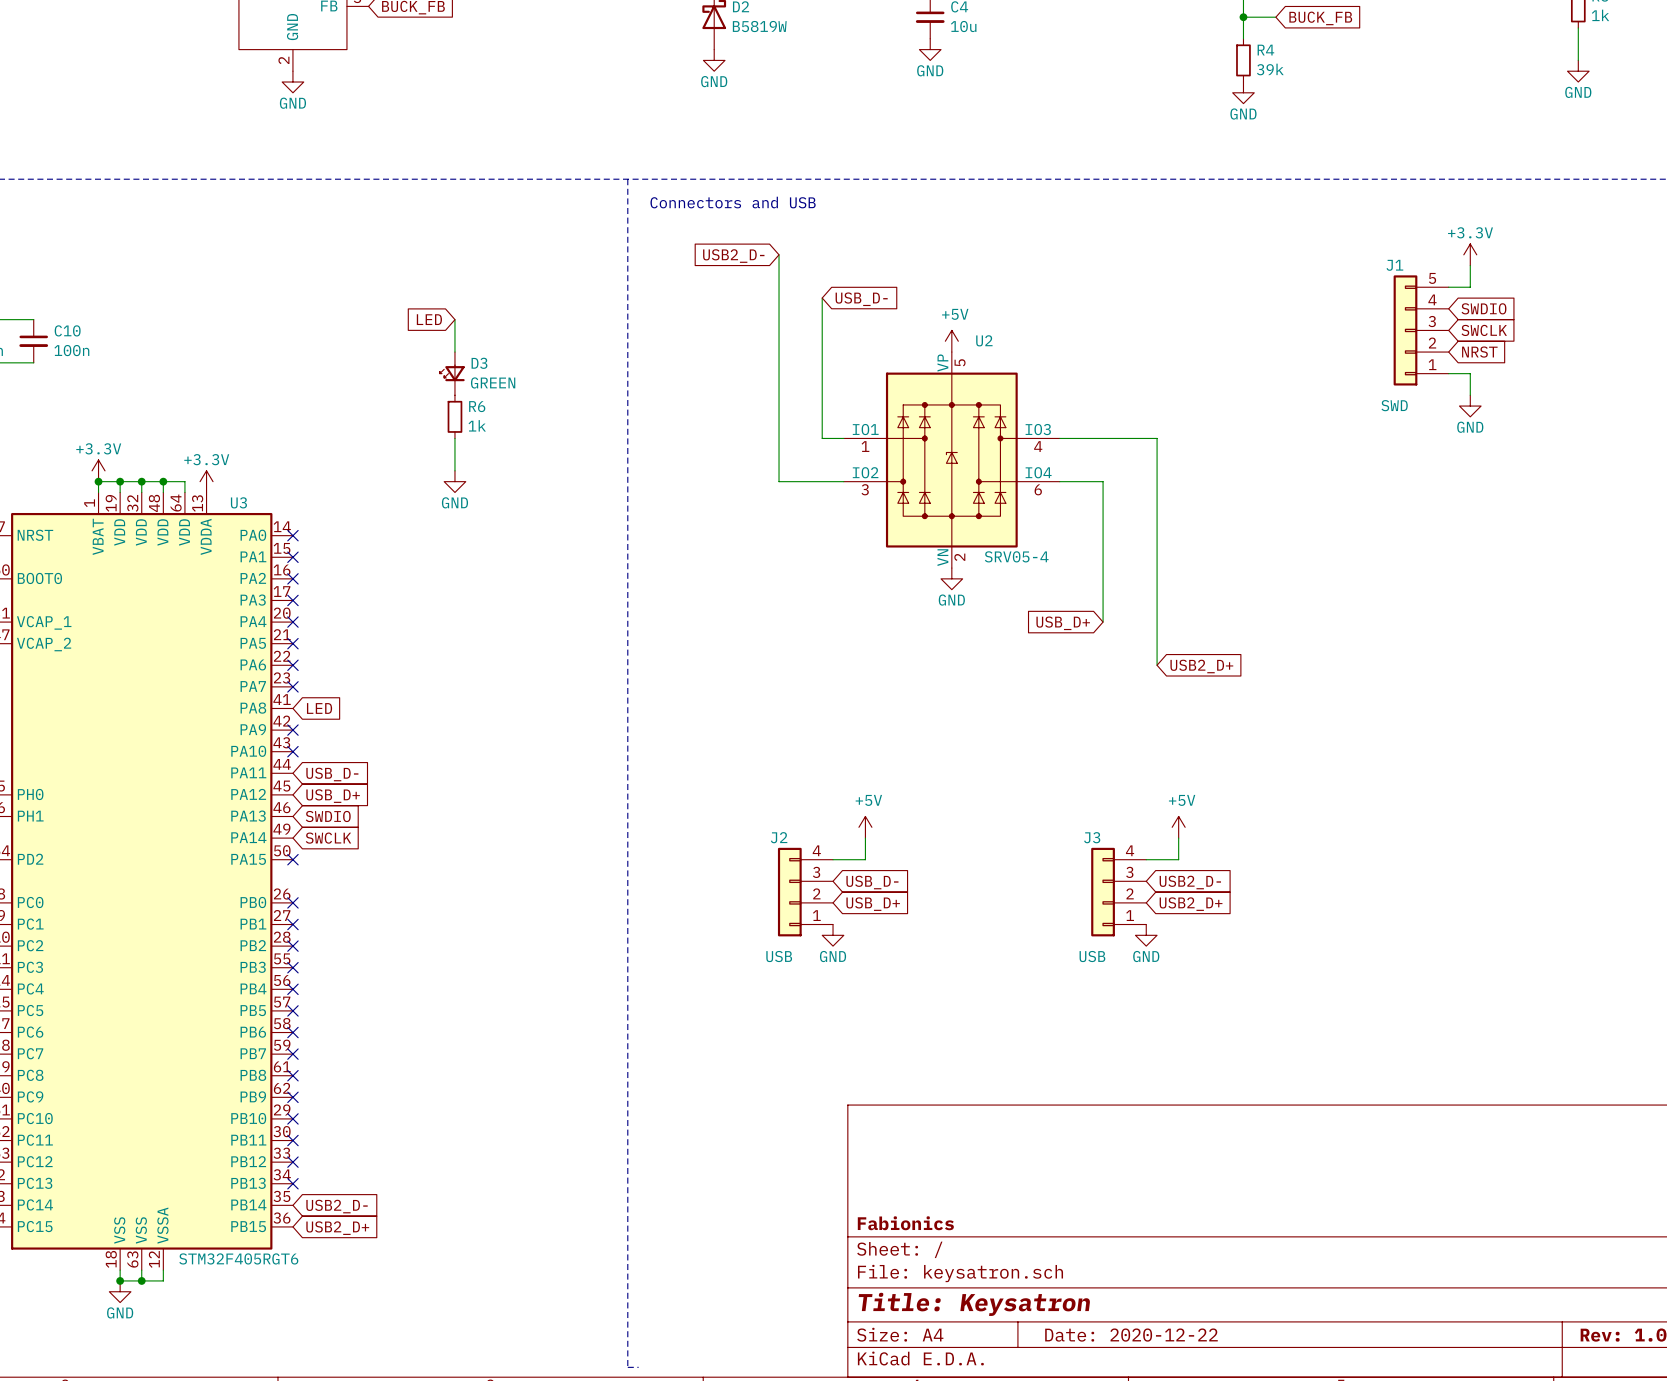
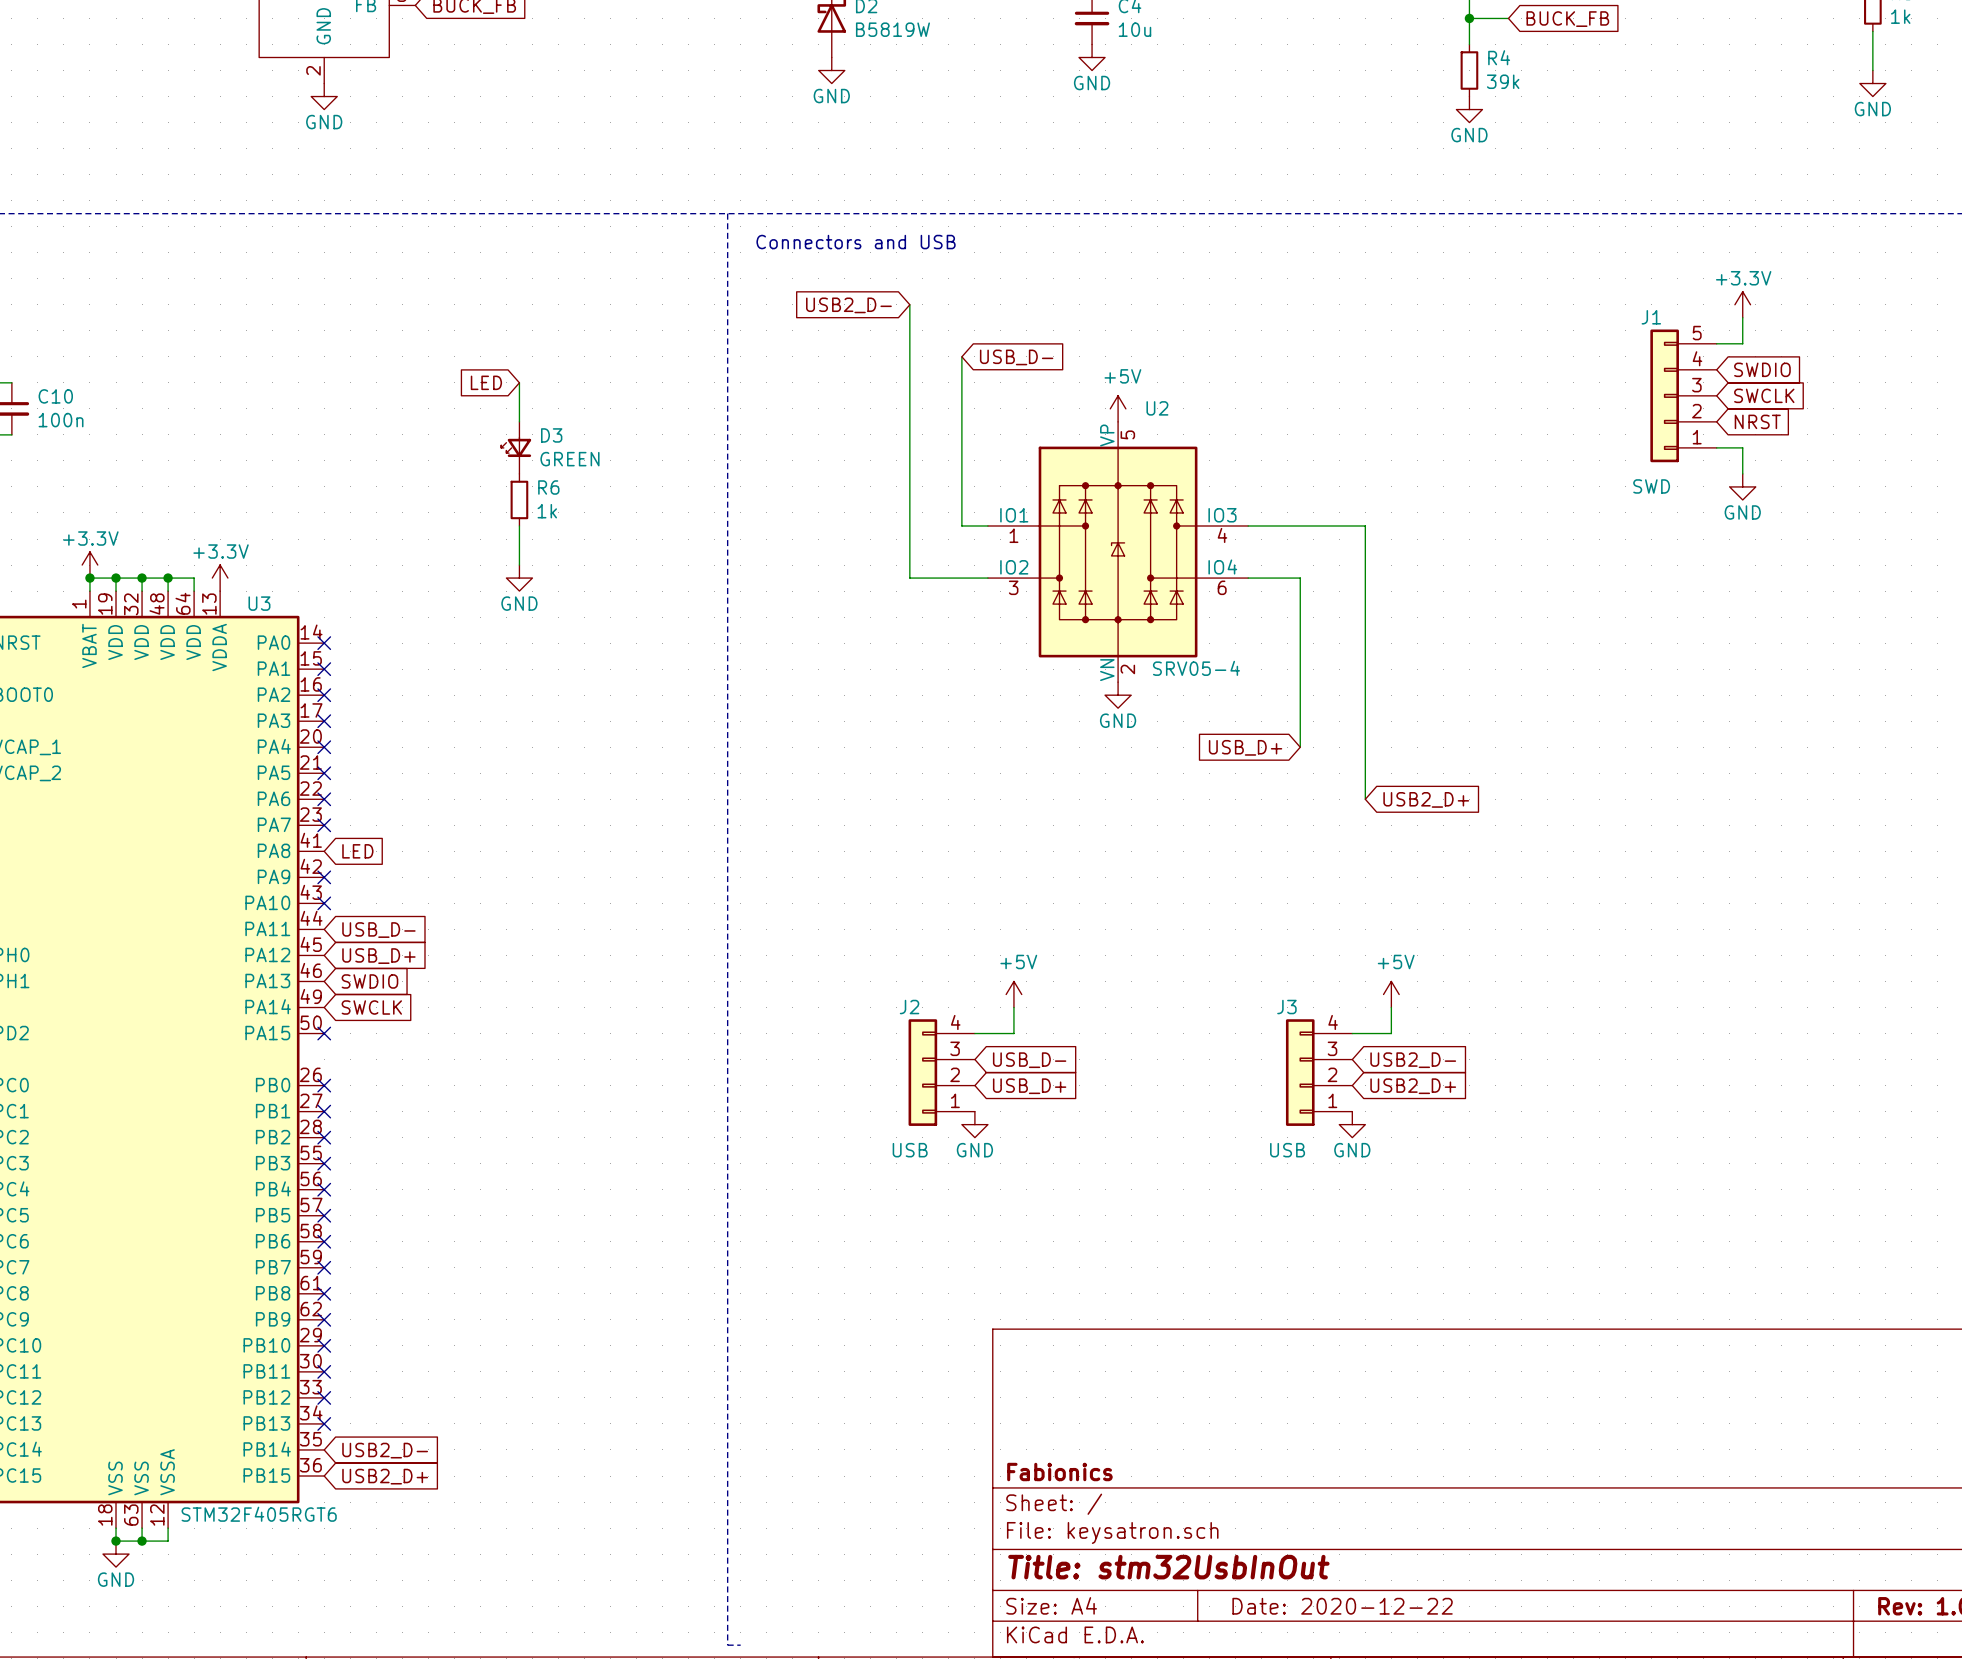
title block: Title: Keysatron (974, 1304) -> Title: stm32UsbInOut (1168, 1567)

